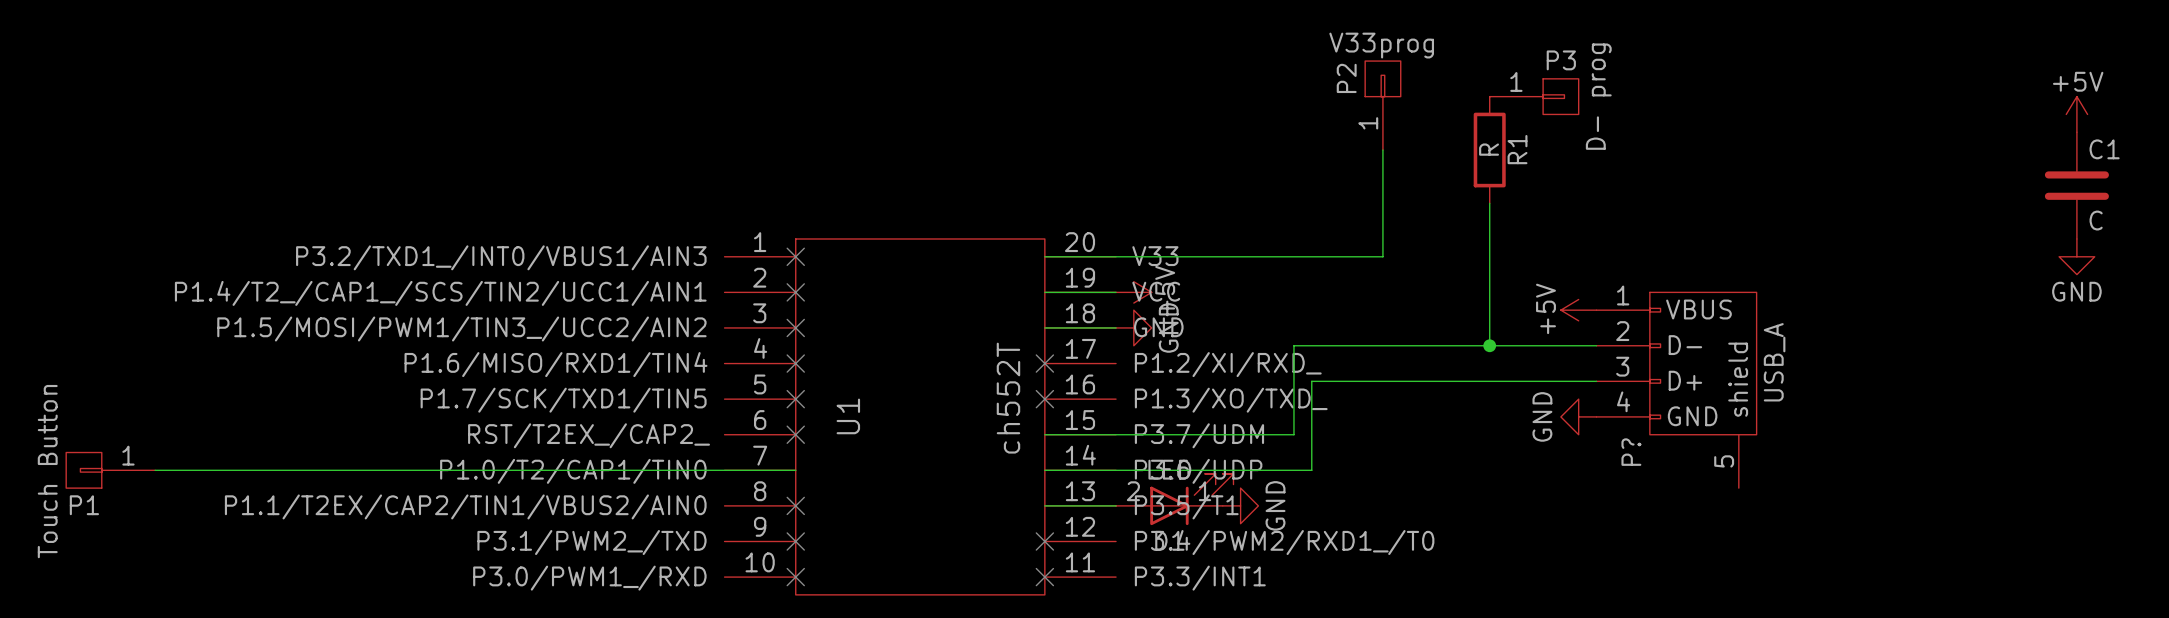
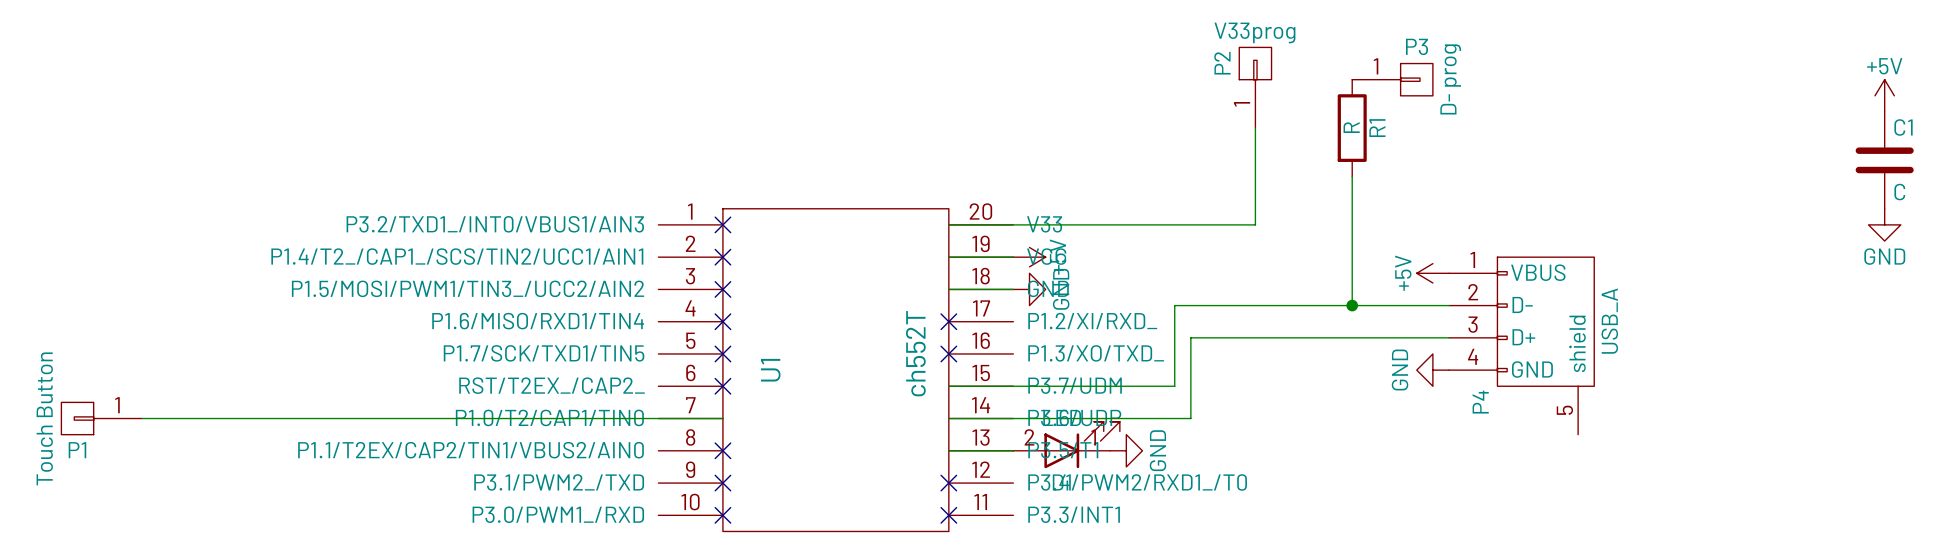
P? name: P? (1631, 452) -> P4 (1480, 402)

